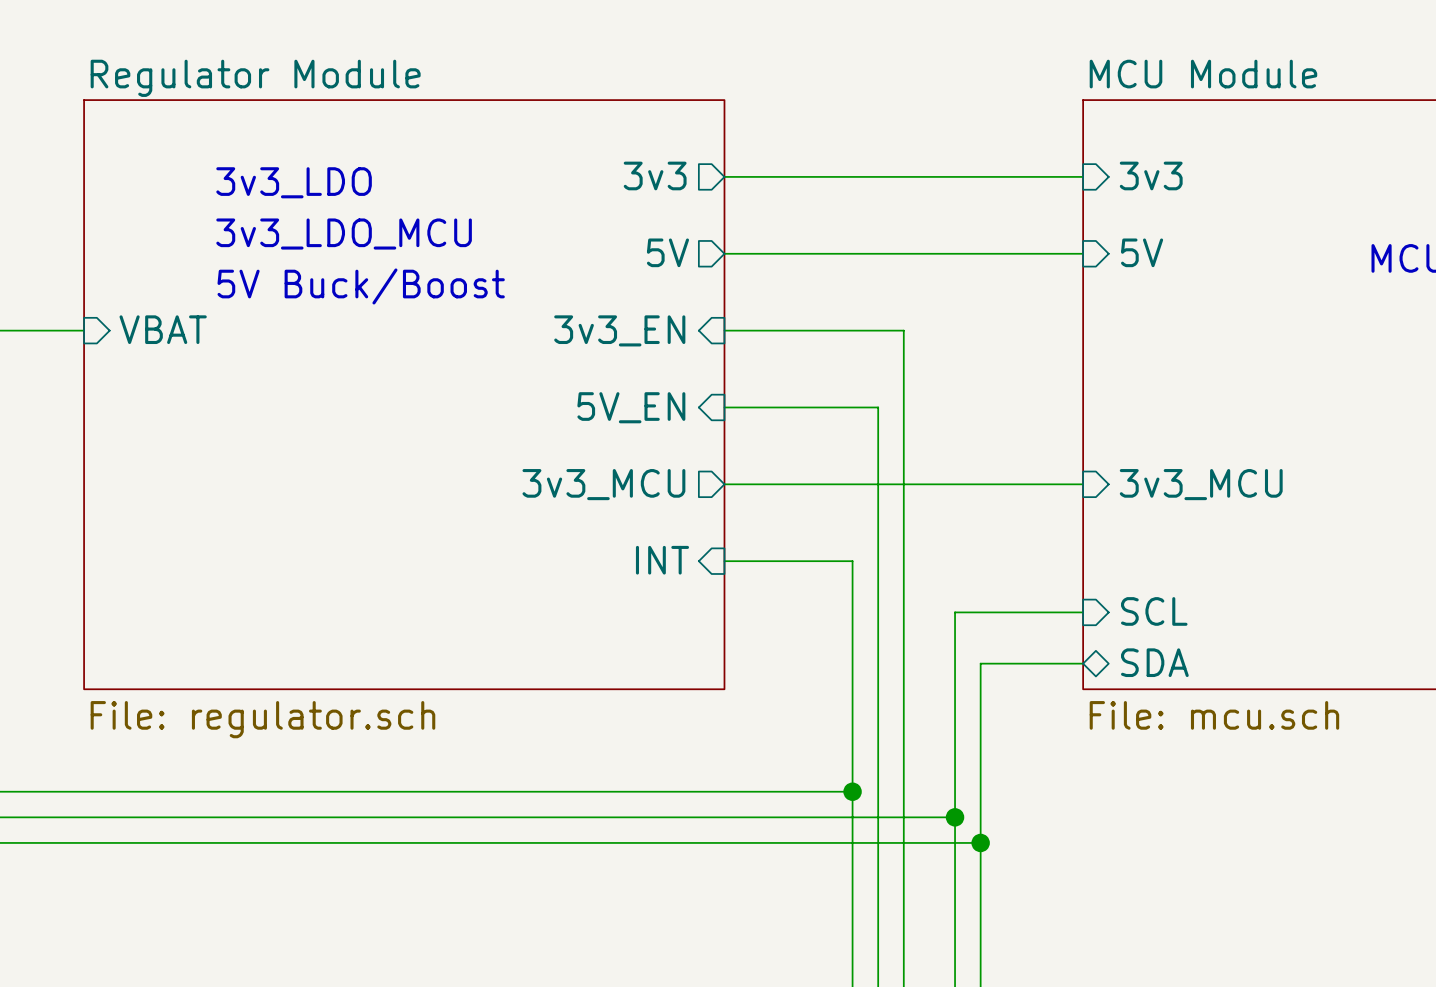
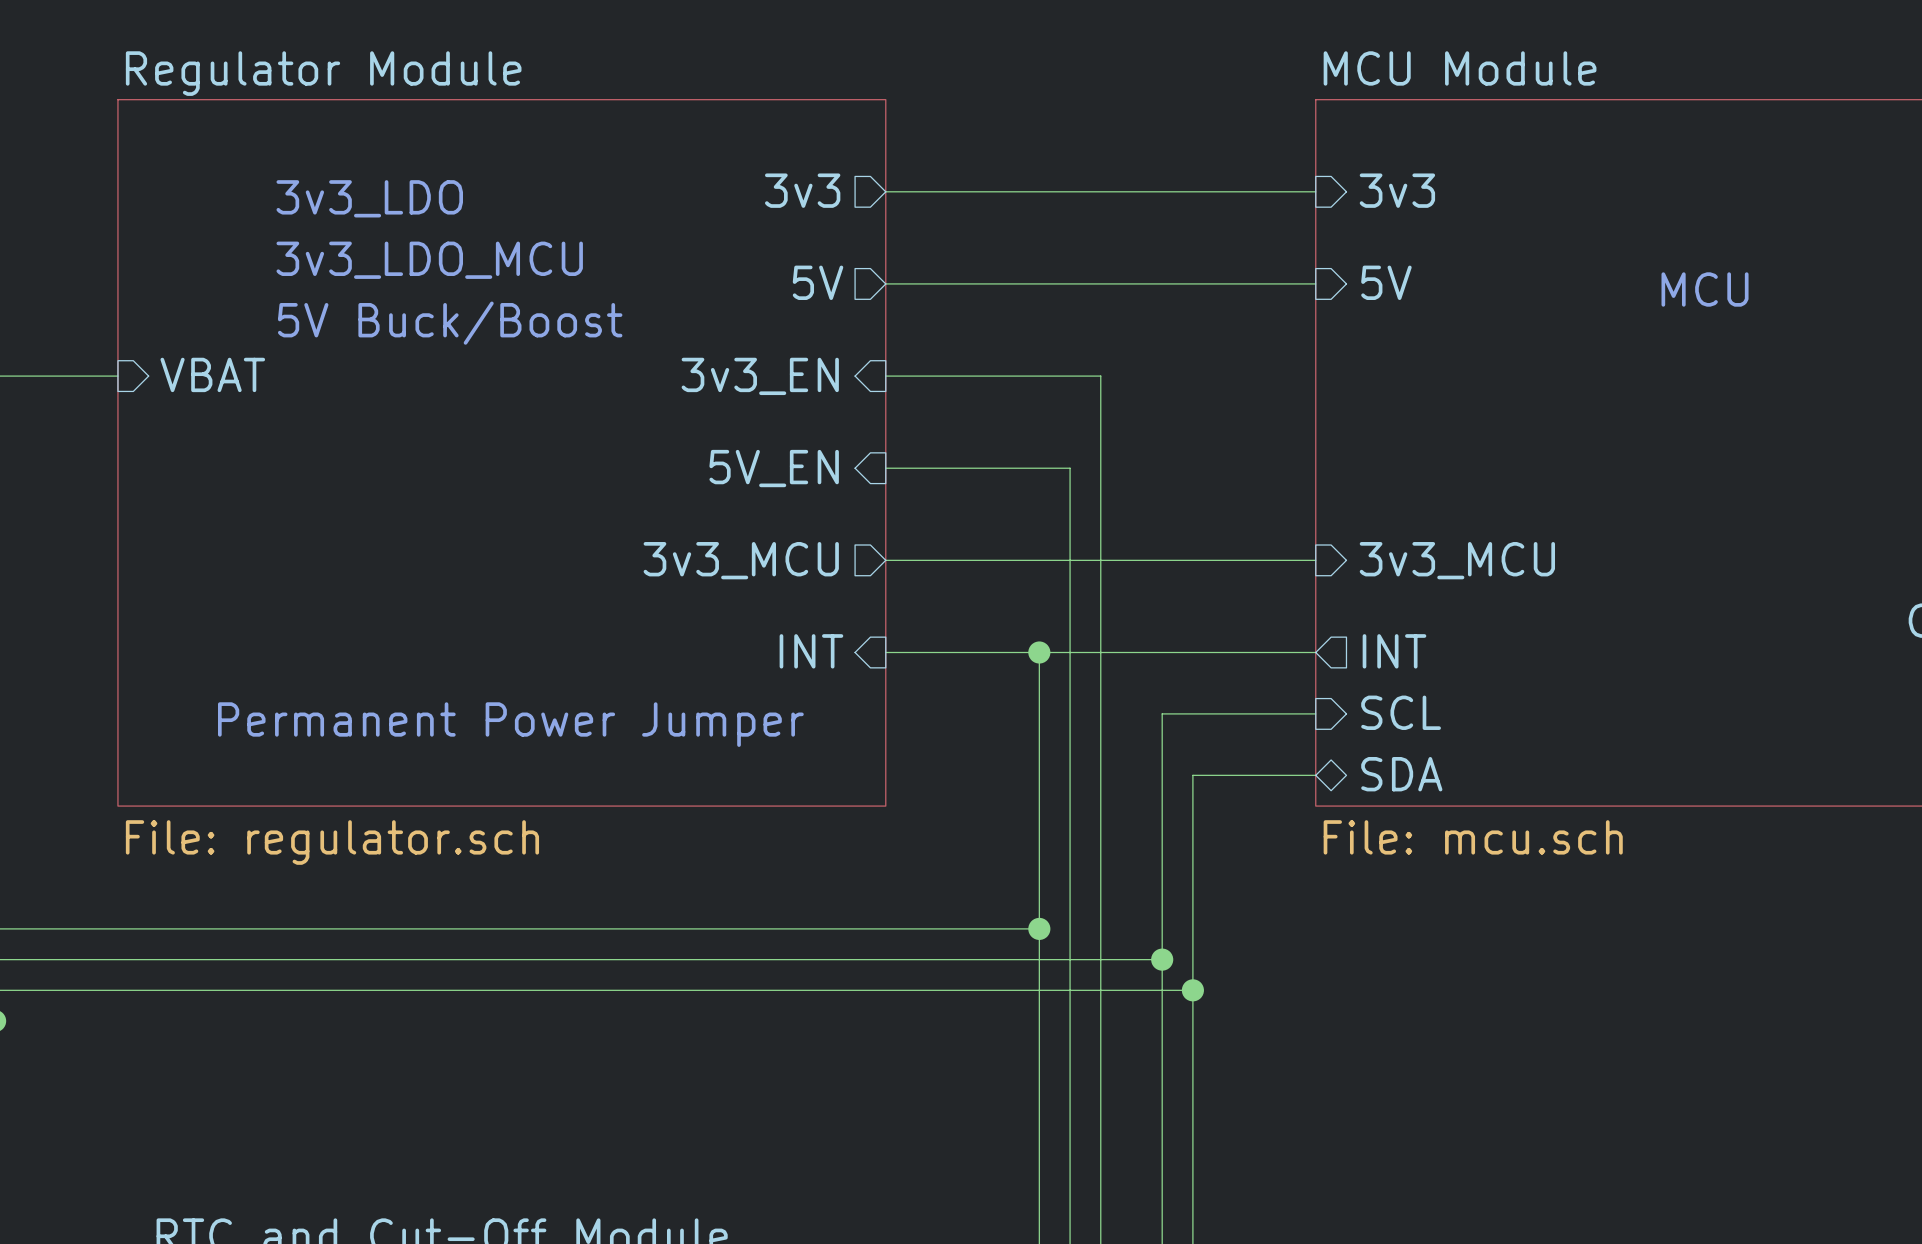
sheet pin: none -> INT (1394, 651)
wire: none -> (1039, 652) (1315, 652)
junction: none -> (1039, 652)
text: none -> Permanent Power Jumper (510, 724)

